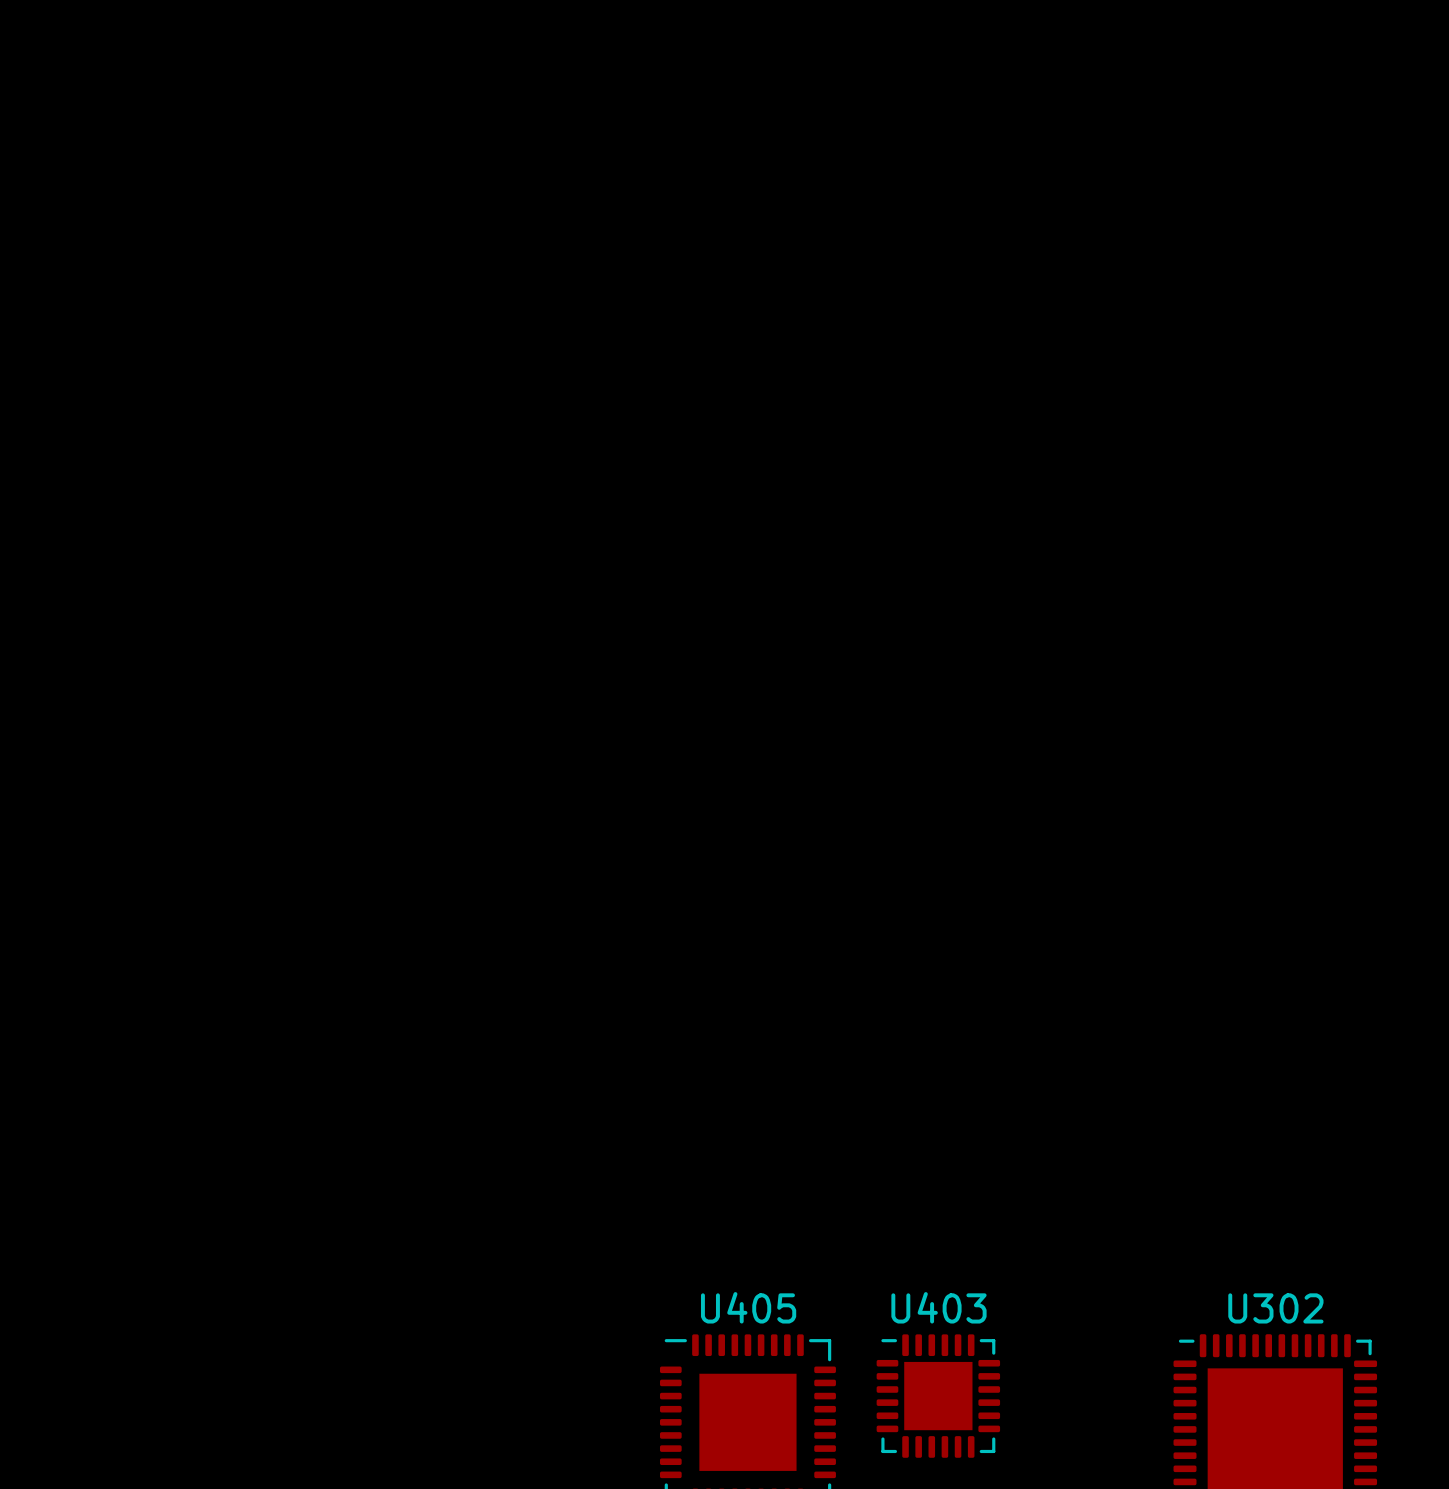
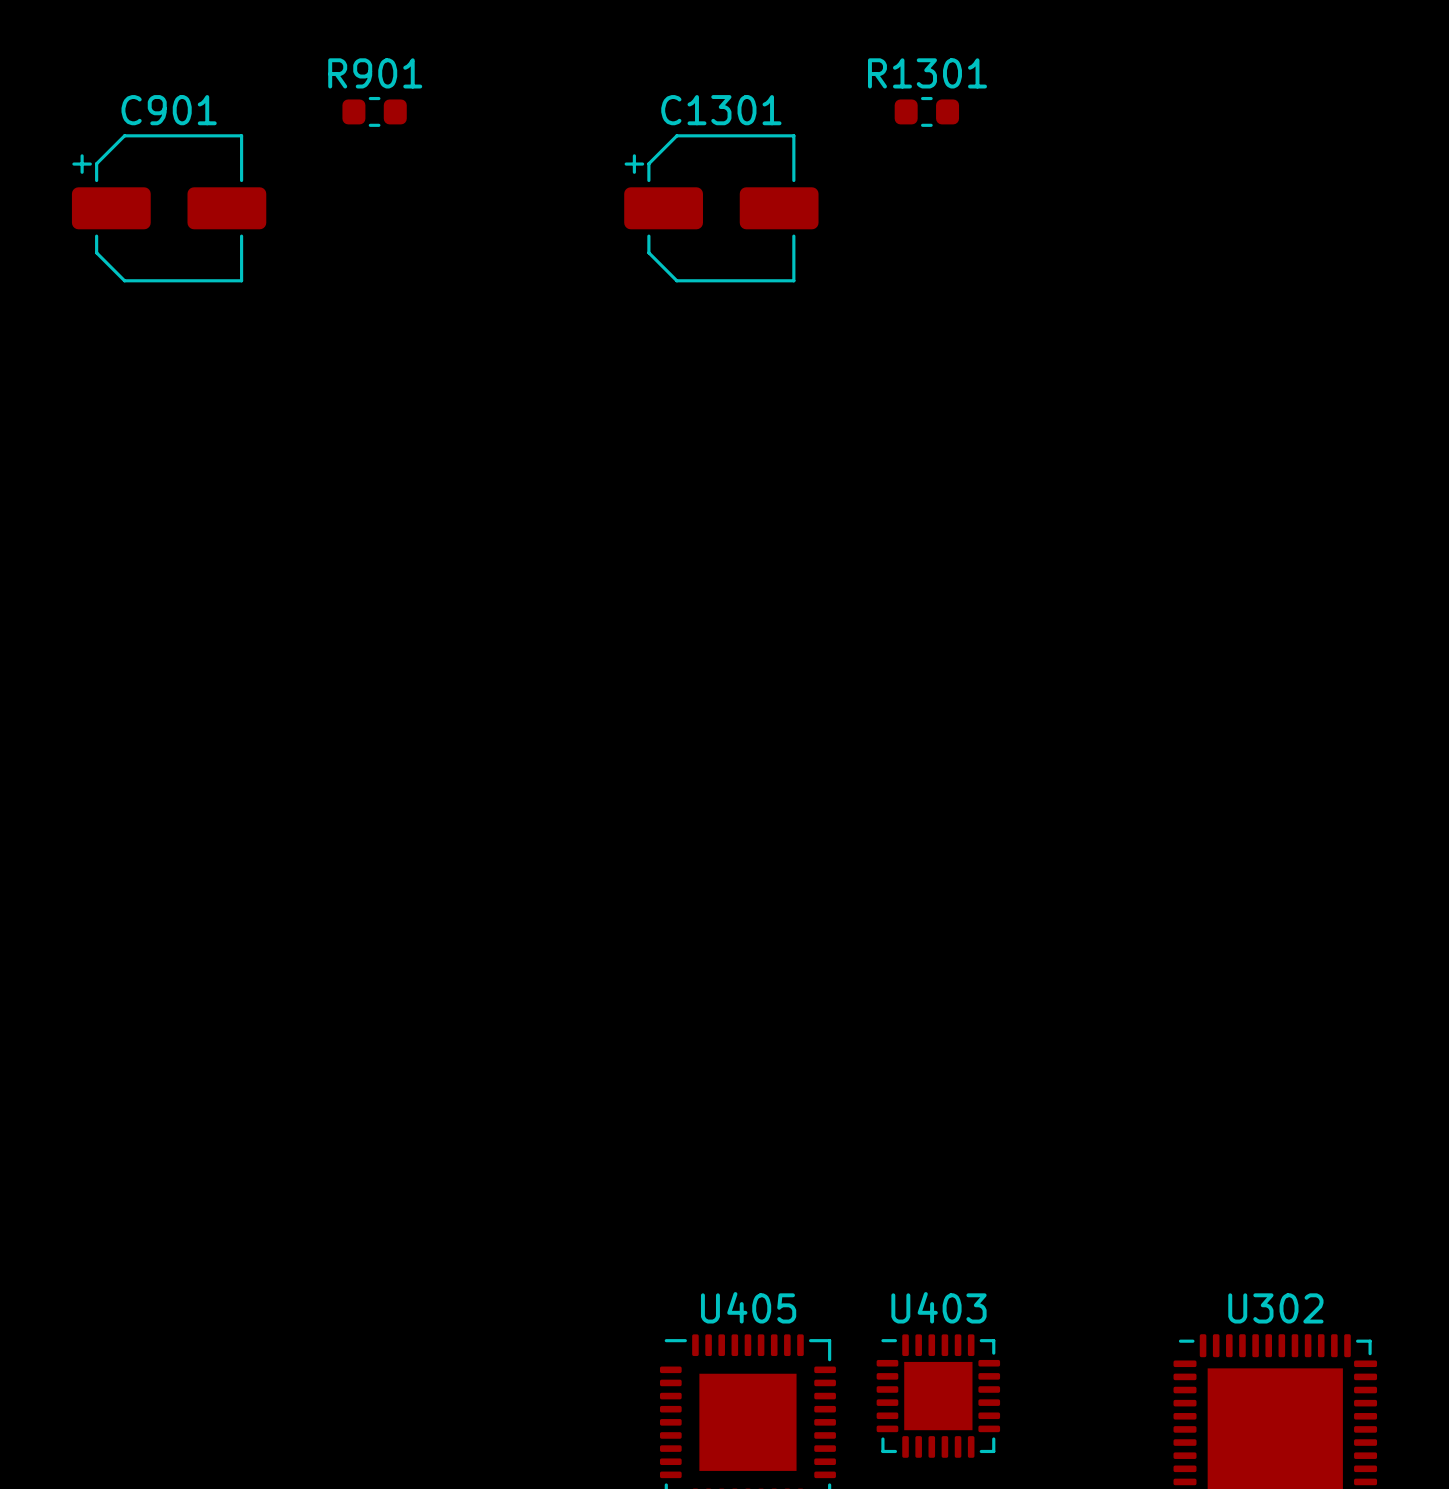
R901: none -> (374, 111)
R1301: none -> (926, 111)
C901: none -> (169, 208)
C1301: none -> (721, 208)

